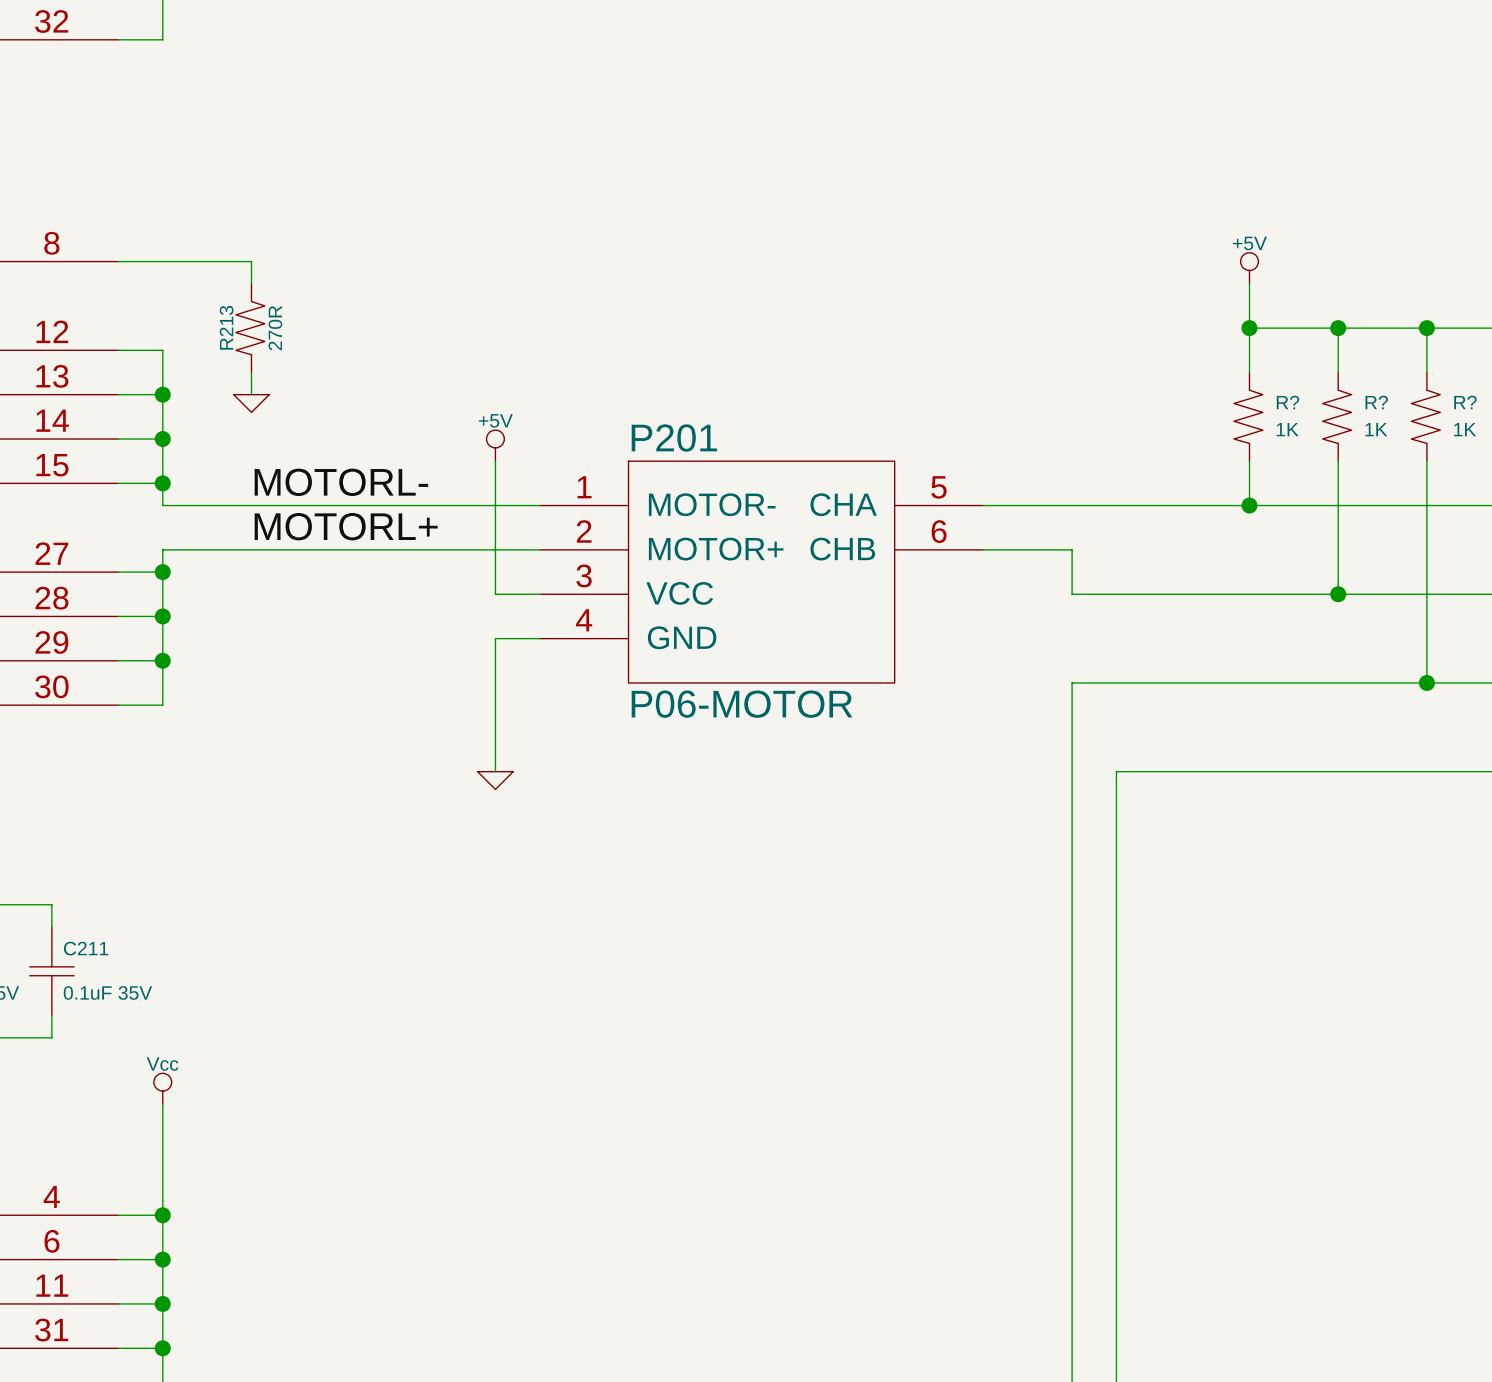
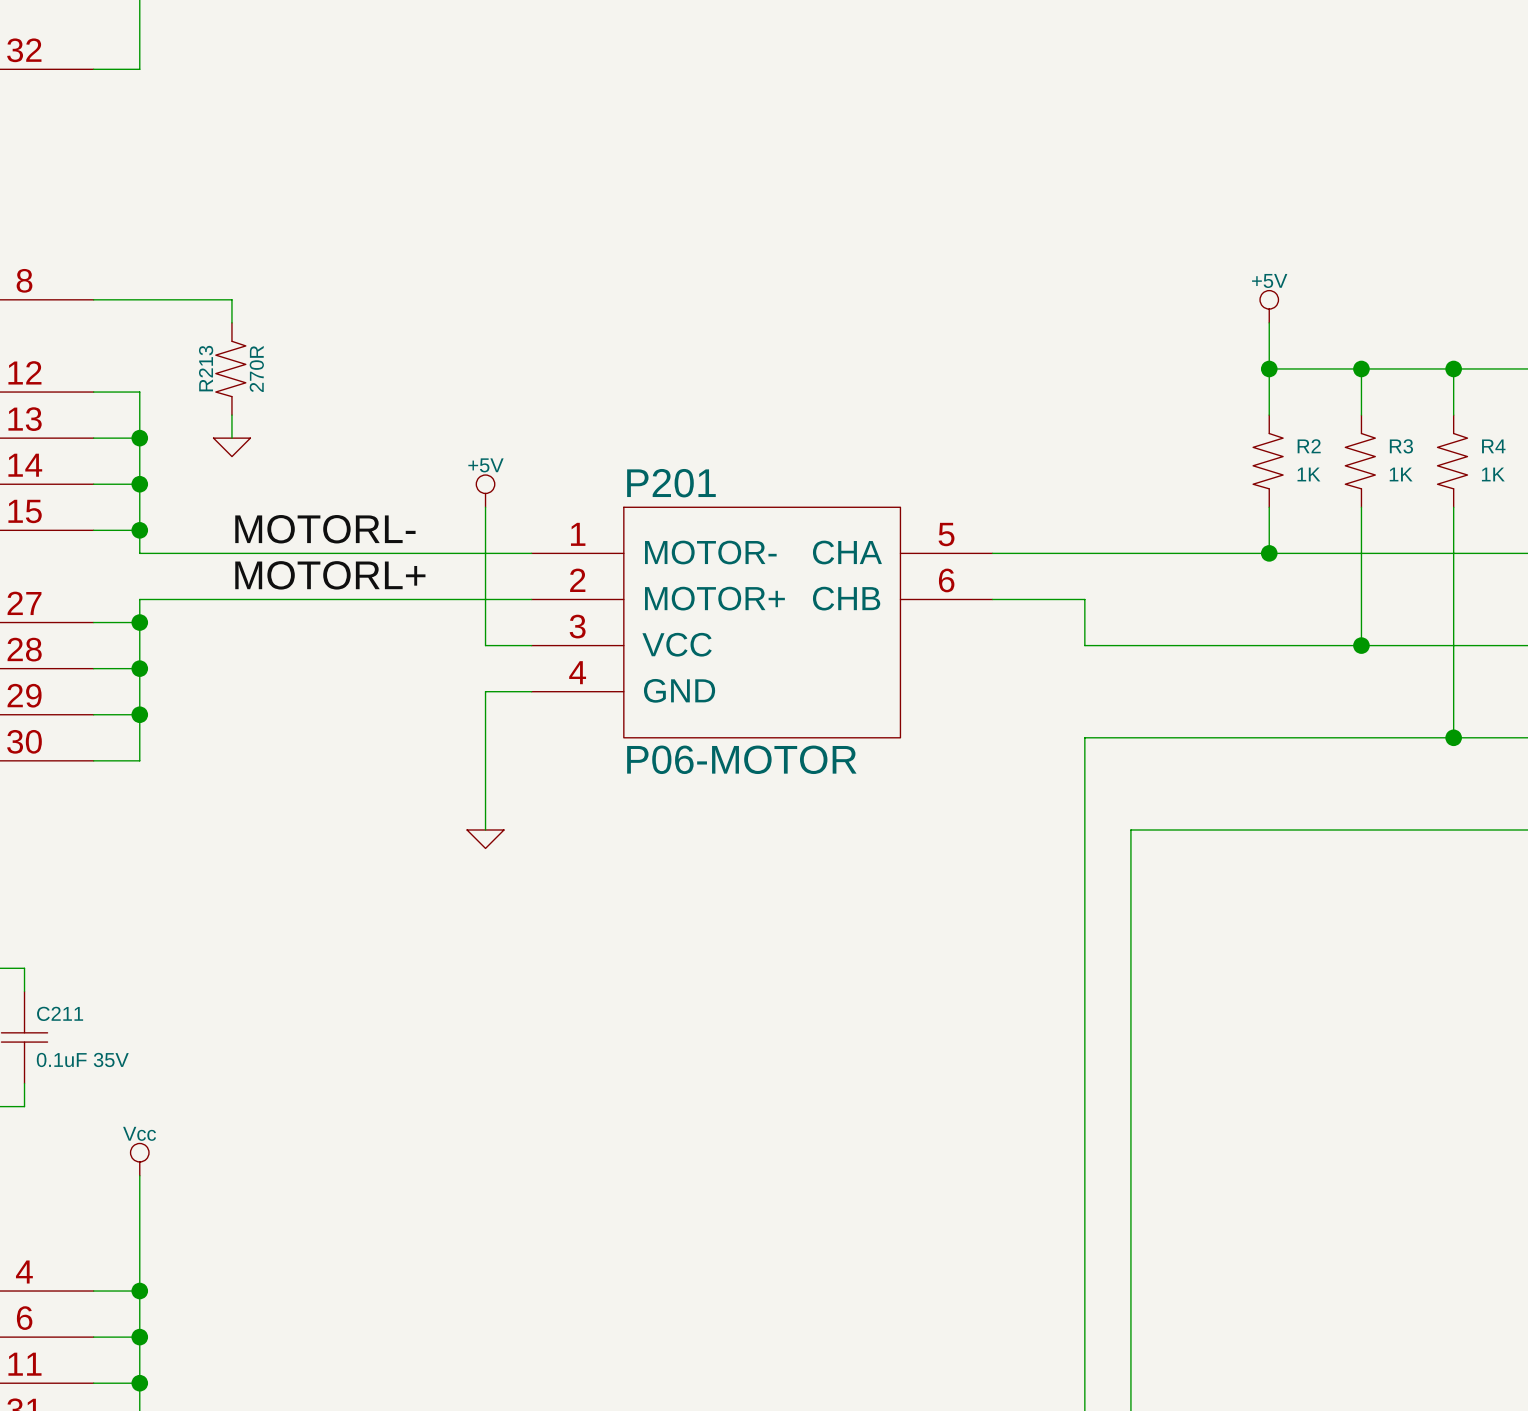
R? name: R? (1288, 402) -> R2 (1309, 446)
R? name: R? (1376, 402) -> R3 (1401, 446)
R? name: R? (1465, 402) -> R4 (1493, 446)

